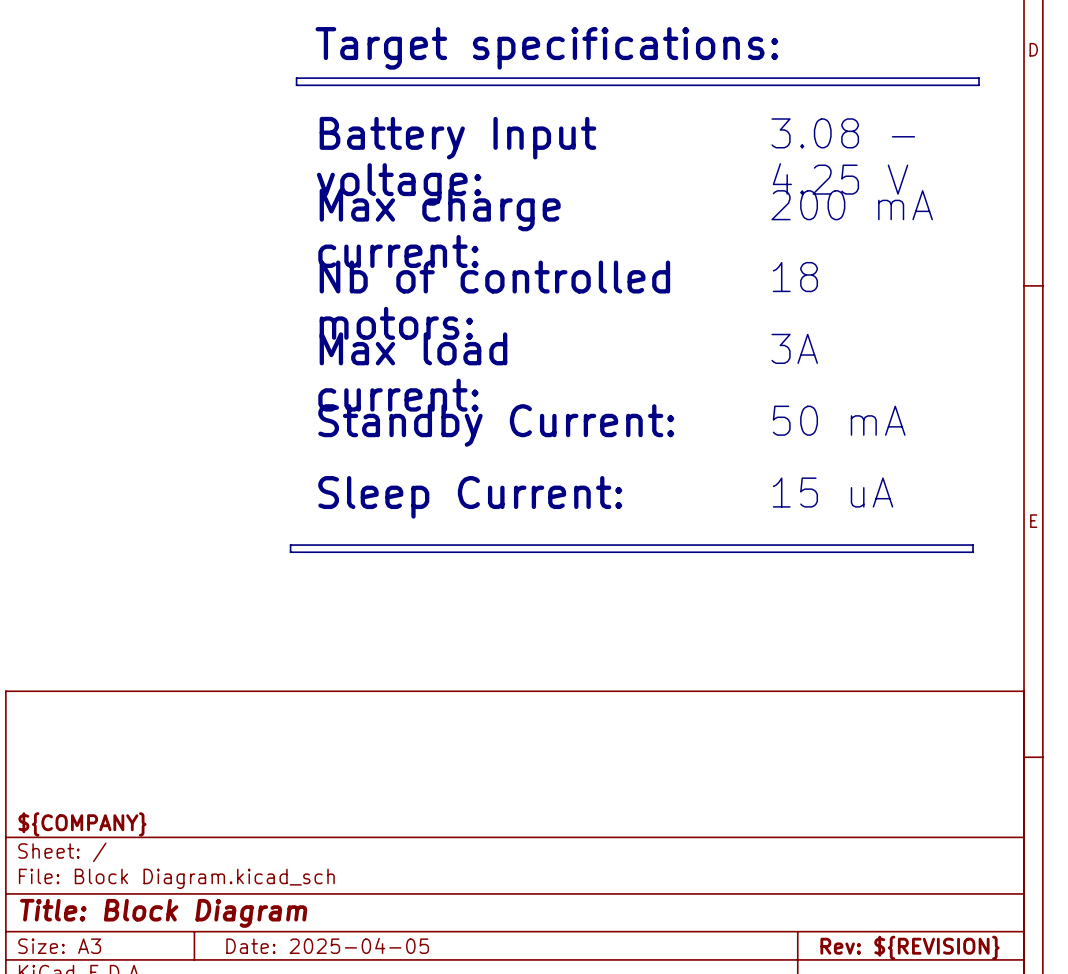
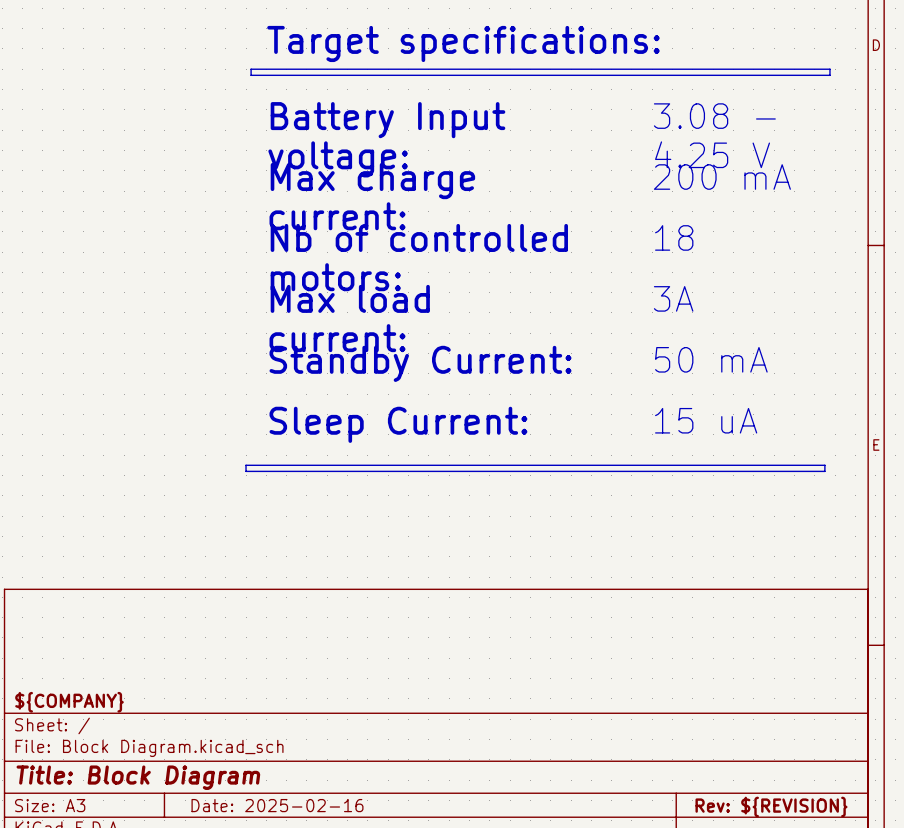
title block: Date: 2025-04-05 (327, 945) -> Date: 2025-02-16 (277, 805)

